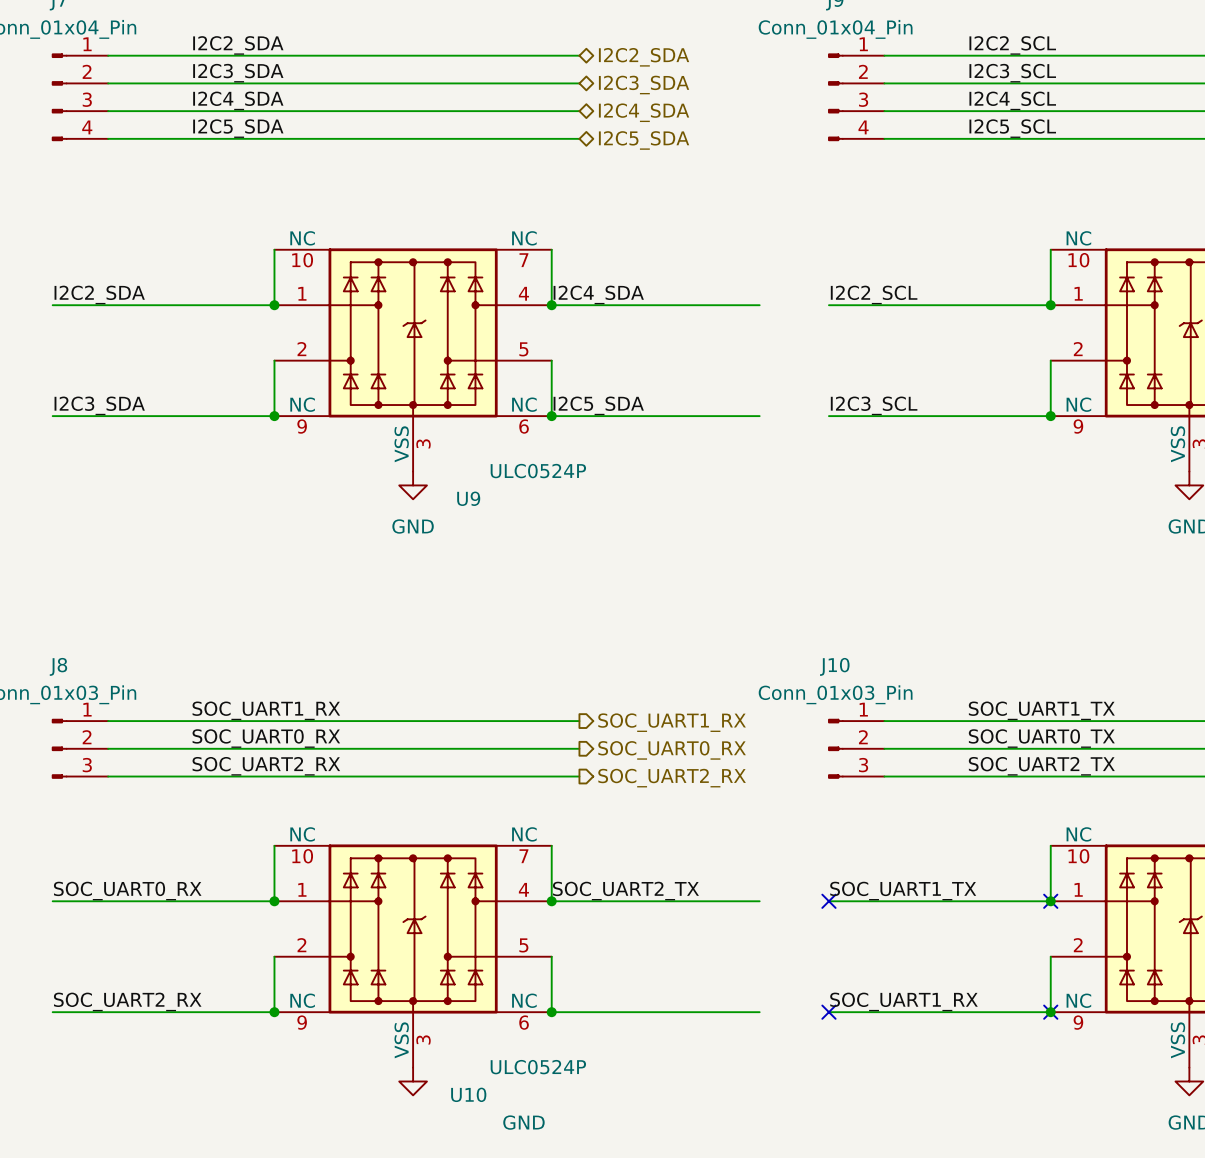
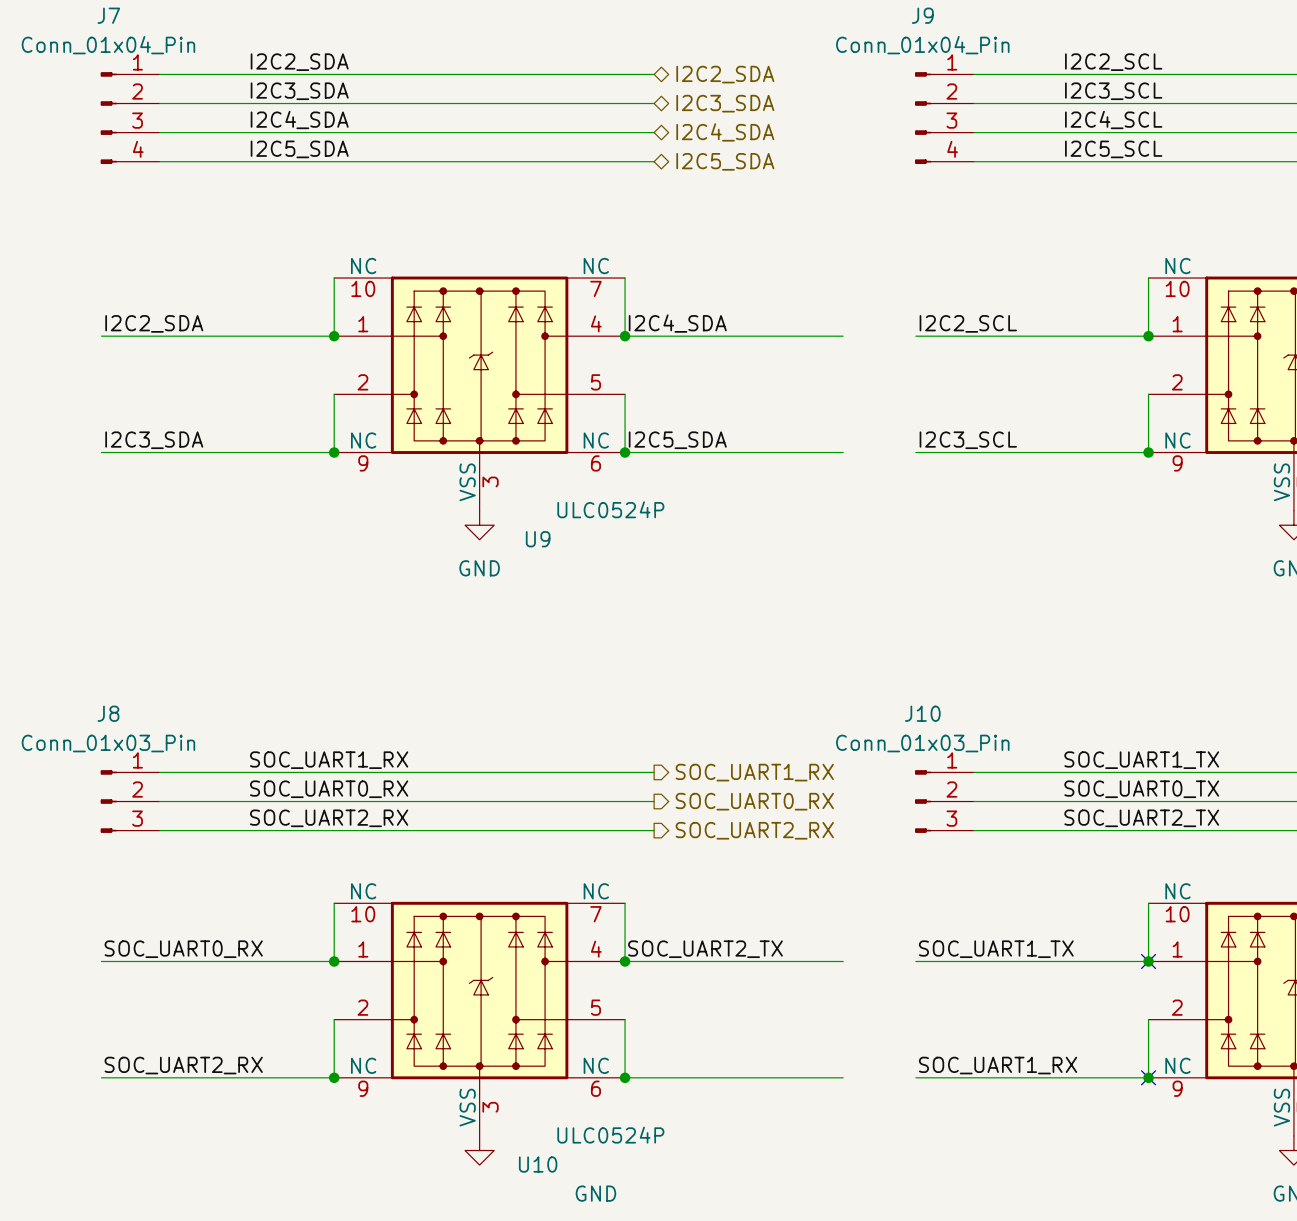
no-connect mark: (828, 901) -> none
no-connect mark: (828, 1012) -> none

